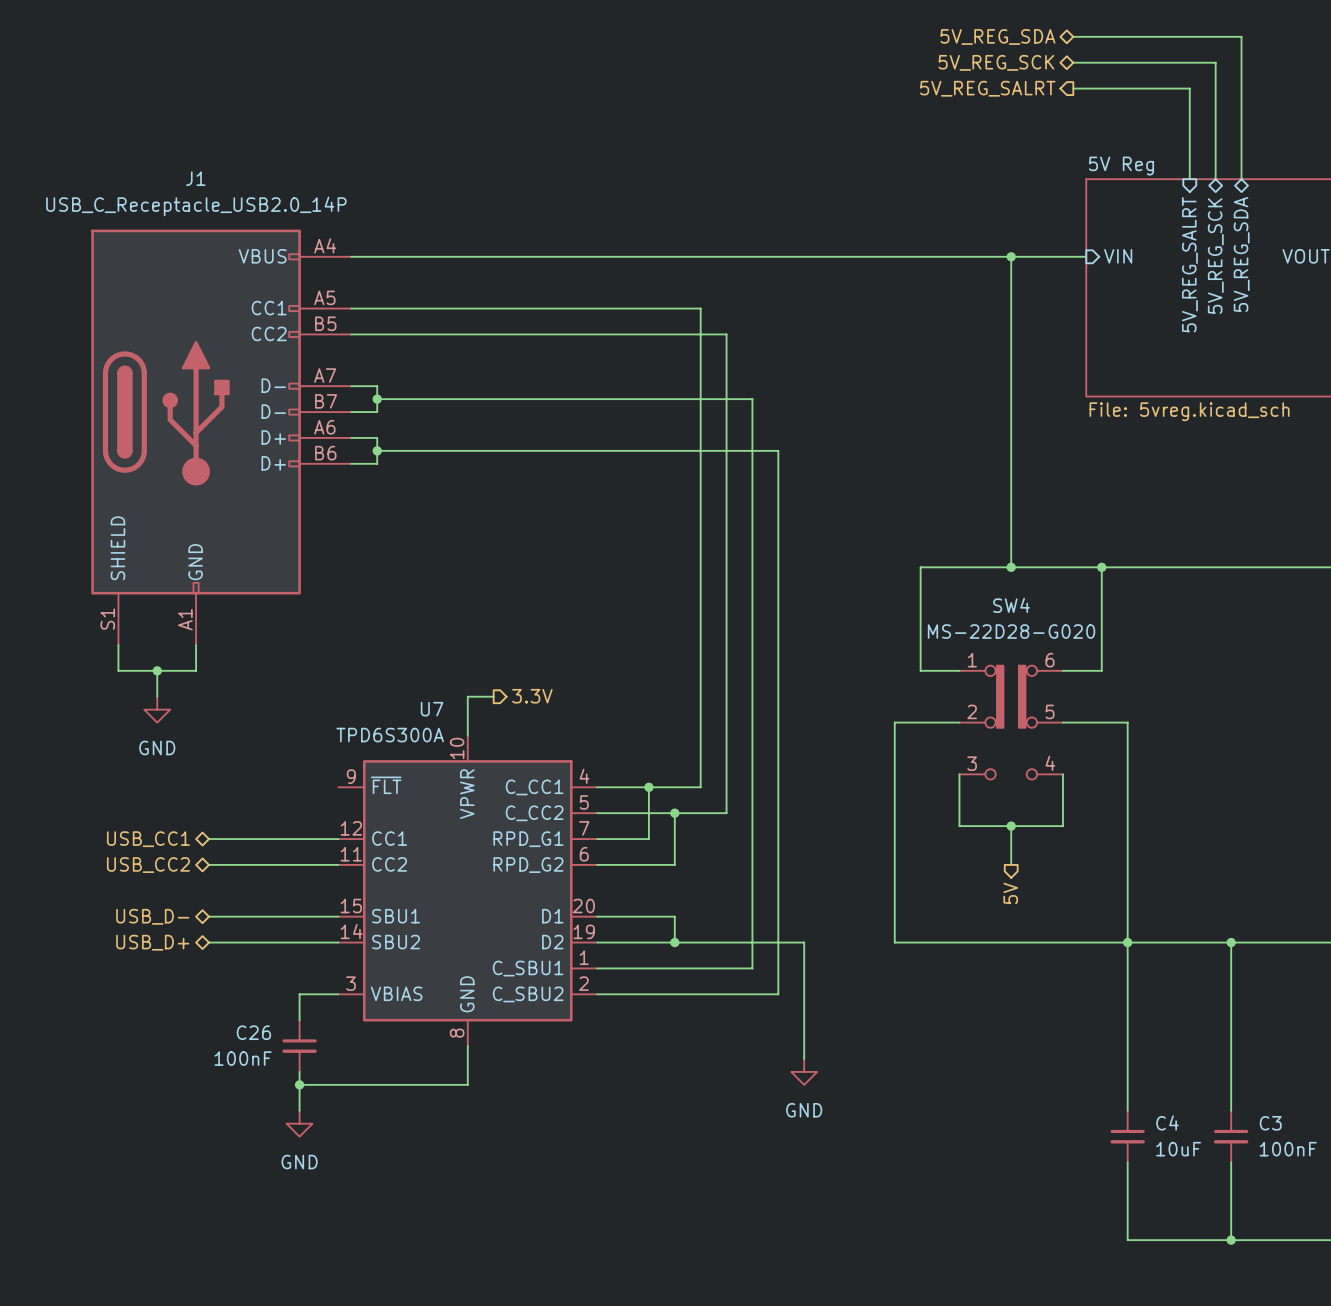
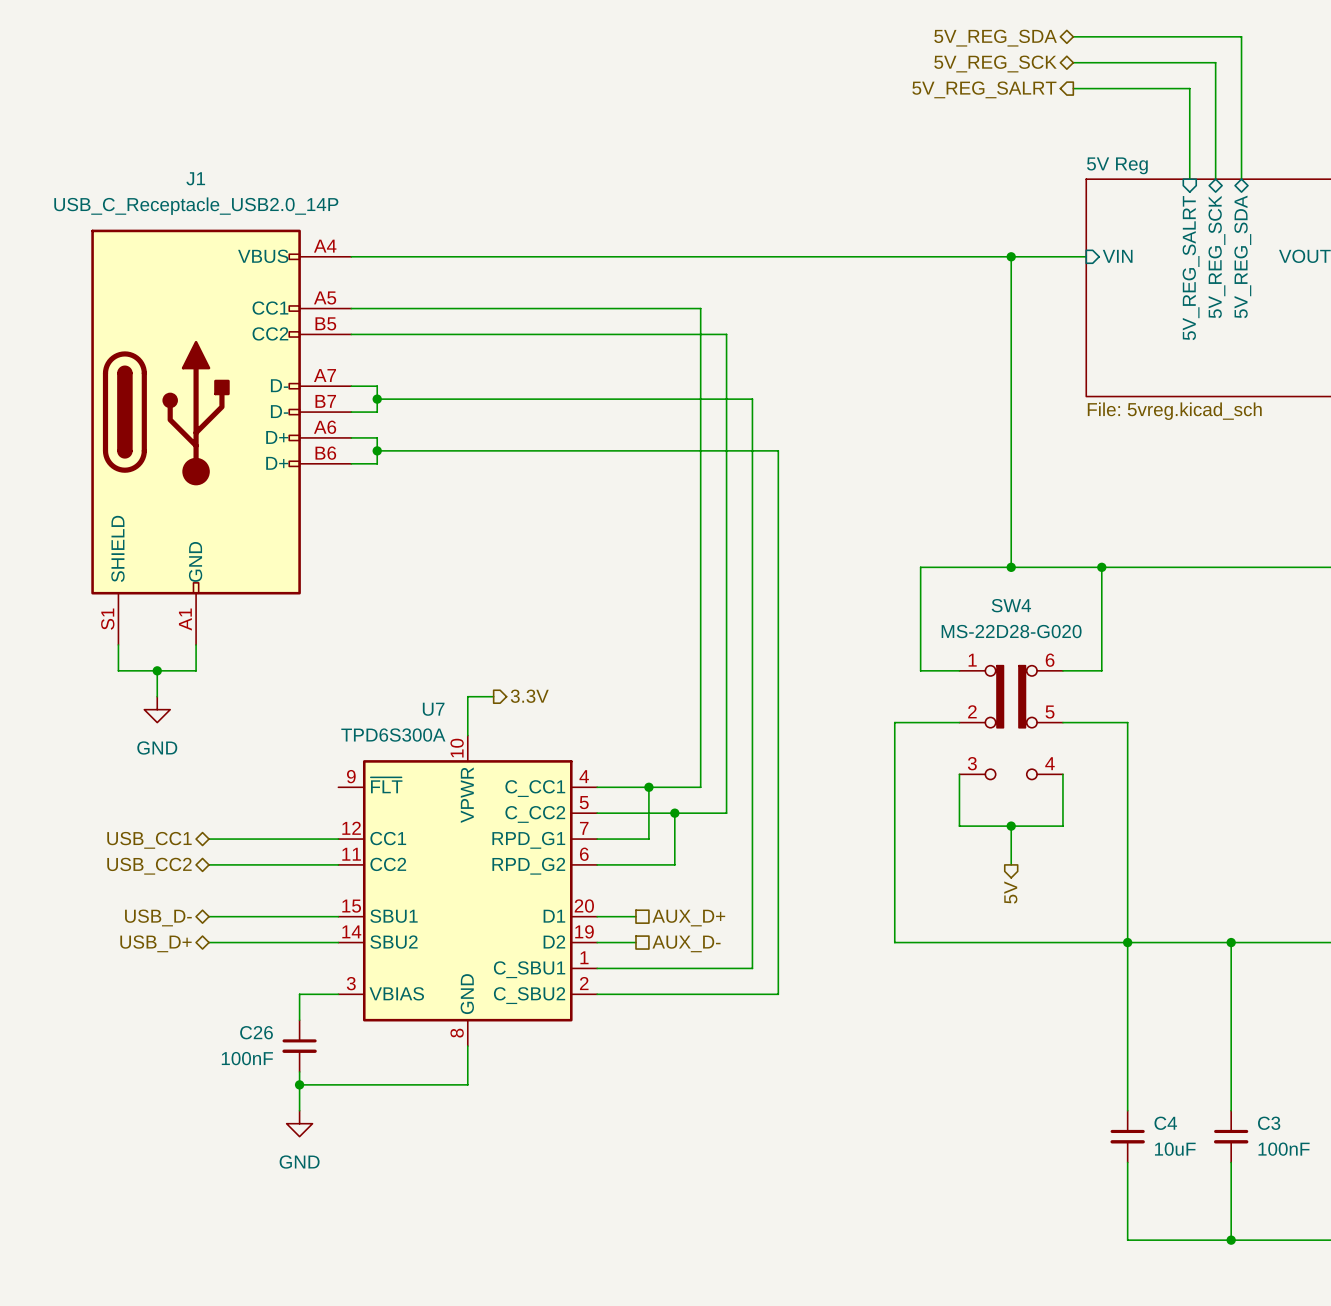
wire: (635, 916) (674, 916) (674, 942) -> none
hierarchical label: none -> AUX_D+ (688, 918)
wire: (635, 942) (804, 942) (804, 1059) -> none
junction: (674, 942) -> none
hierarchical label: none -> AUX_D- (686, 943)
power symbol: GND (804, 1071) -> none

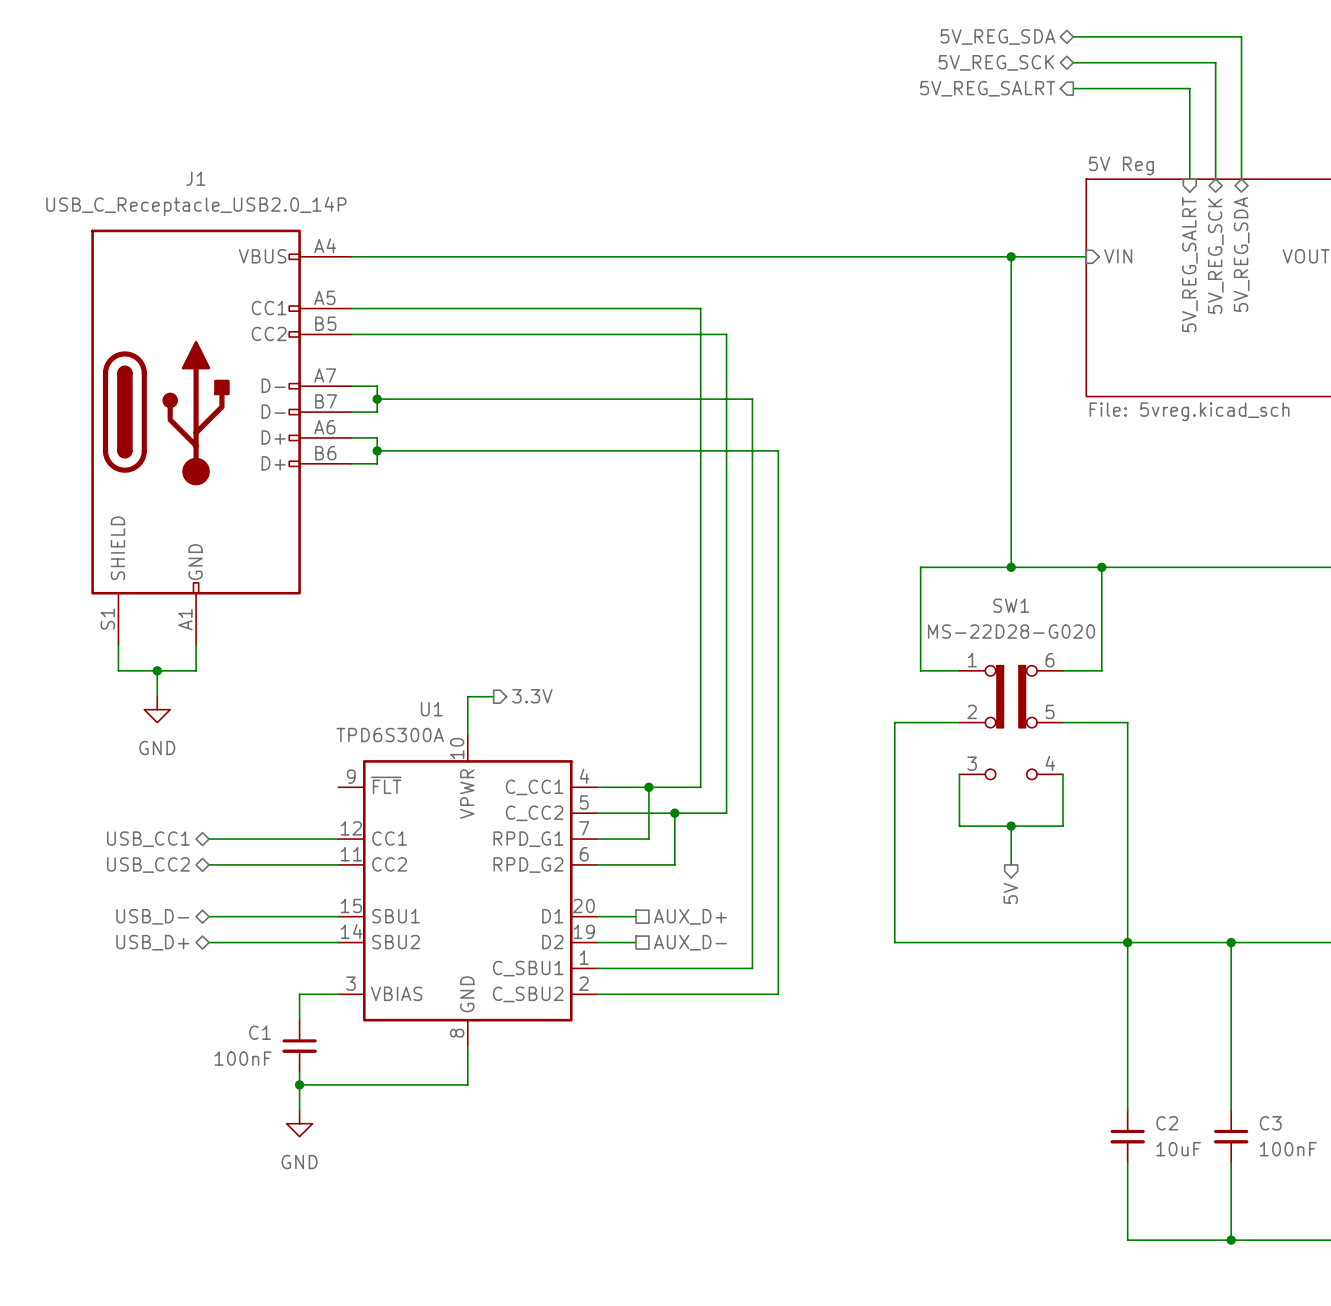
SW4 name: SW4 (1011, 605) -> SW1 (1011, 605)
U7 name: U7 (433, 709) -> U1 (431, 709)
C26 name: C26 (256, 1032) -> C1 (260, 1032)
C4 name: C4 (1165, 1123) -> C2 (1167, 1123)

